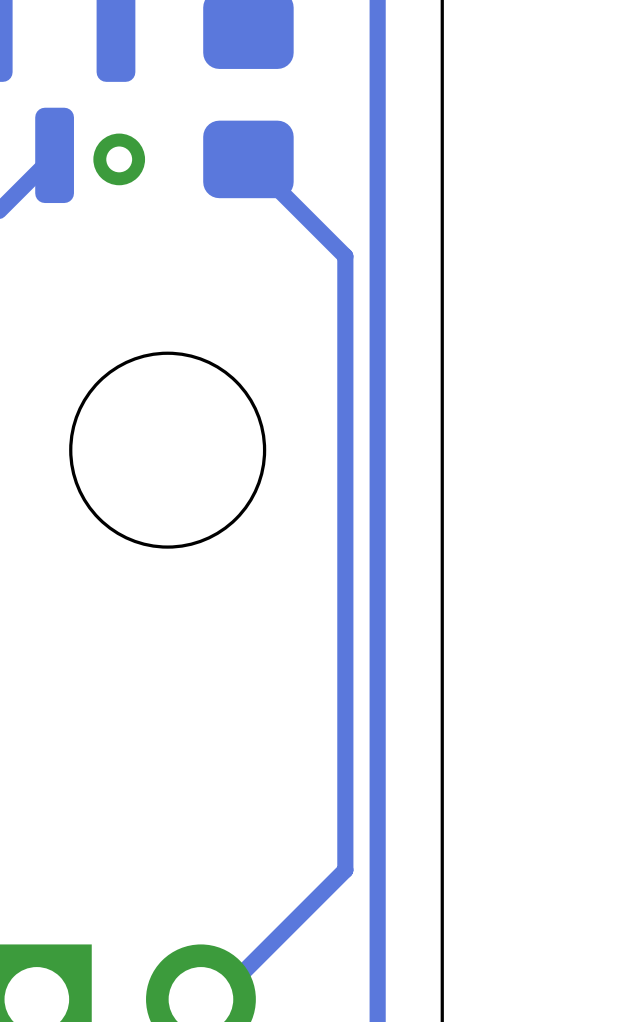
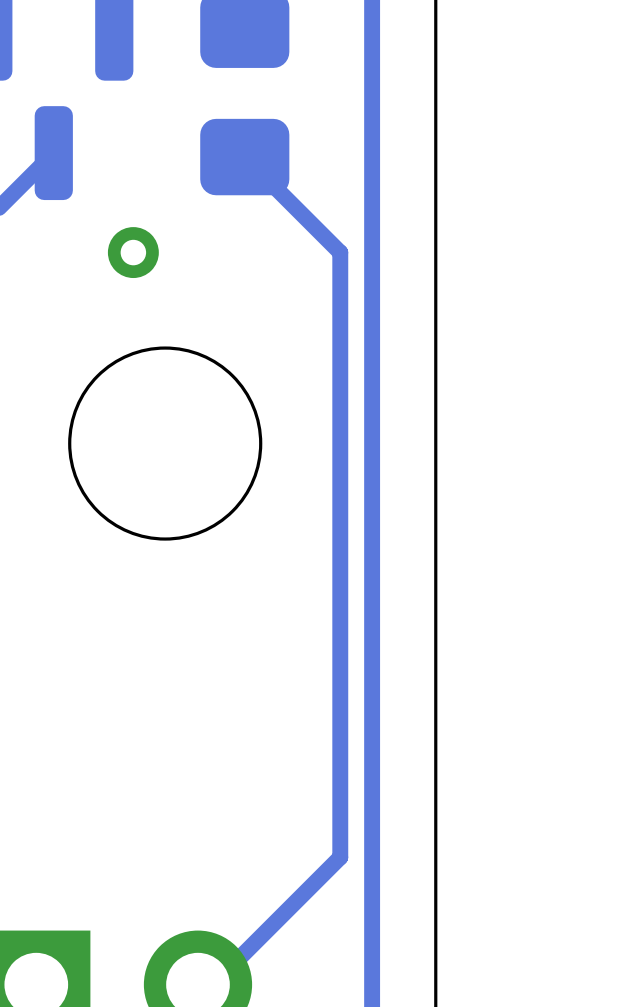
via position: (119, 159) -> (133, 252)

